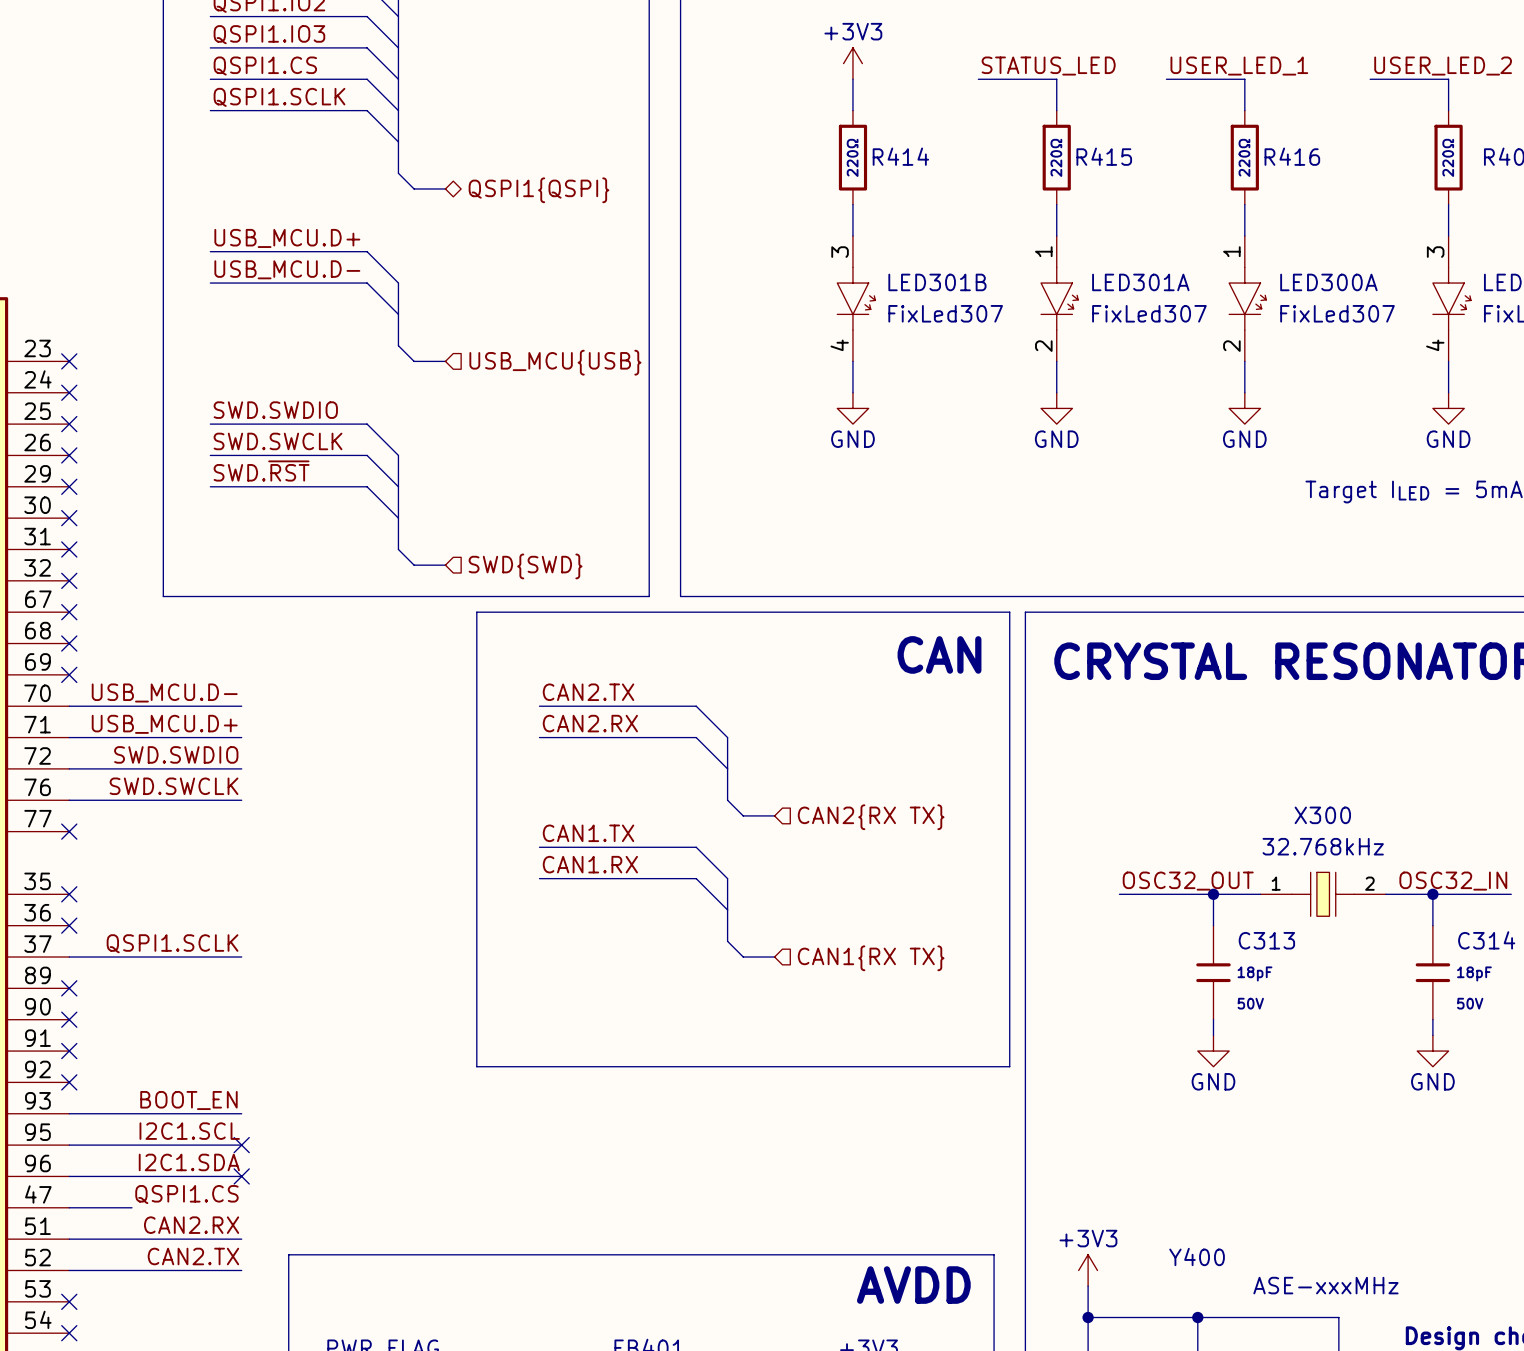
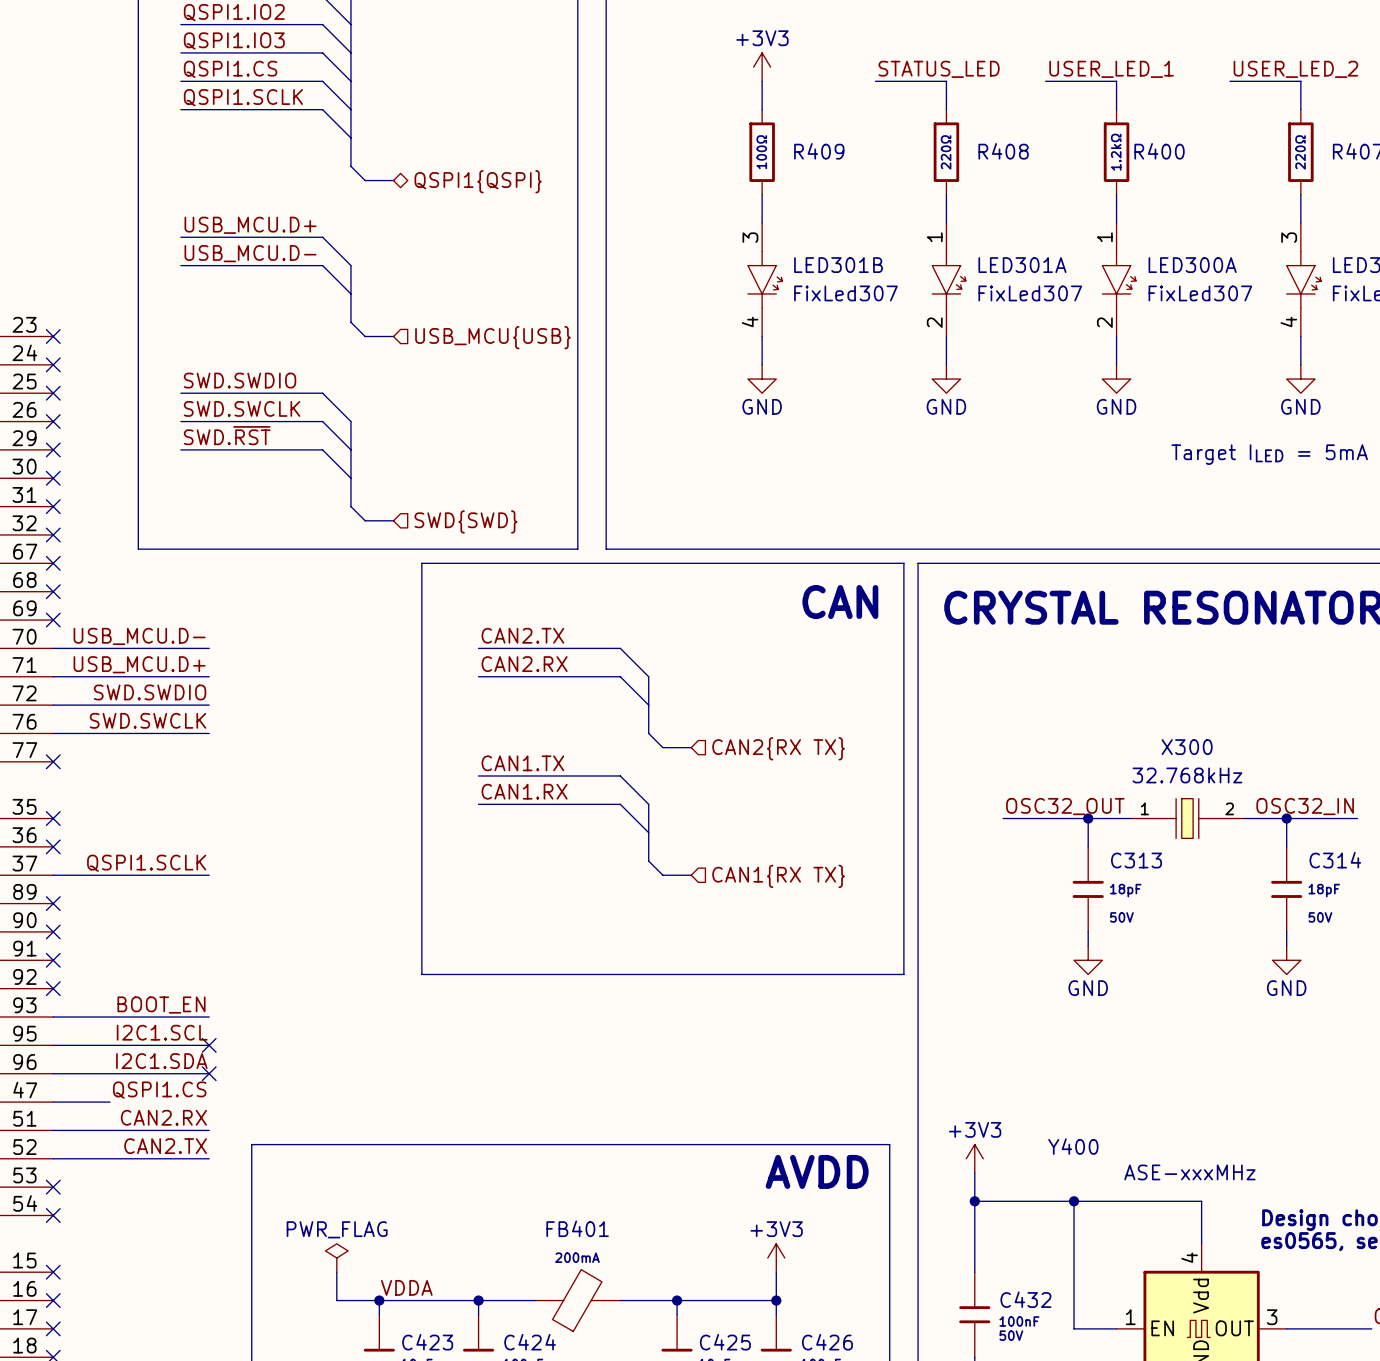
R414 name: R414 (900, 156) -> R409 (819, 151)
R415 name: R415 (1104, 156) -> R408 (1003, 151)
R416 name: R416 (1292, 156) -> R400 (1159, 151)
R414 value: 220Ω (852, 157) -> 100Ω (761, 152)
R416 value: 220Ω (1244, 157) -> 1.2kΩ (1116, 152)

